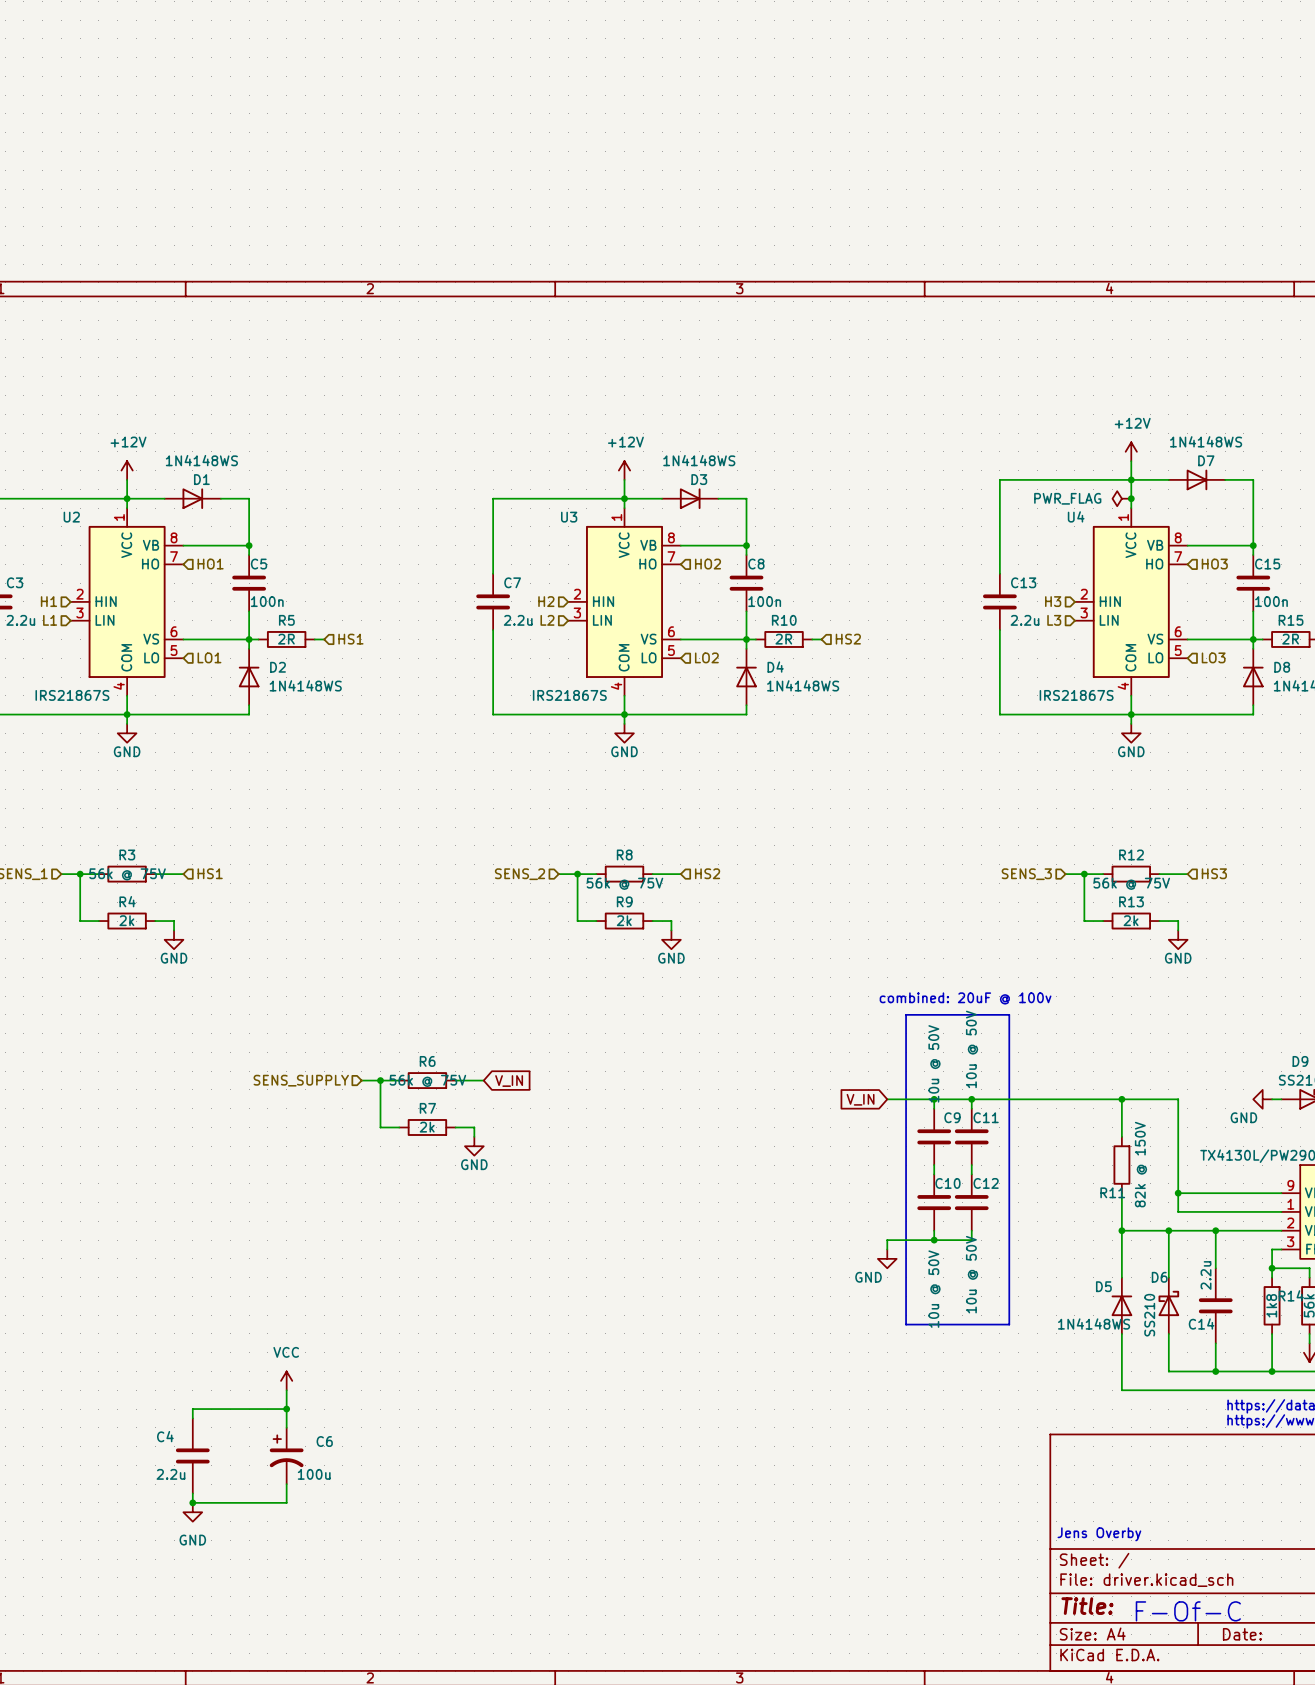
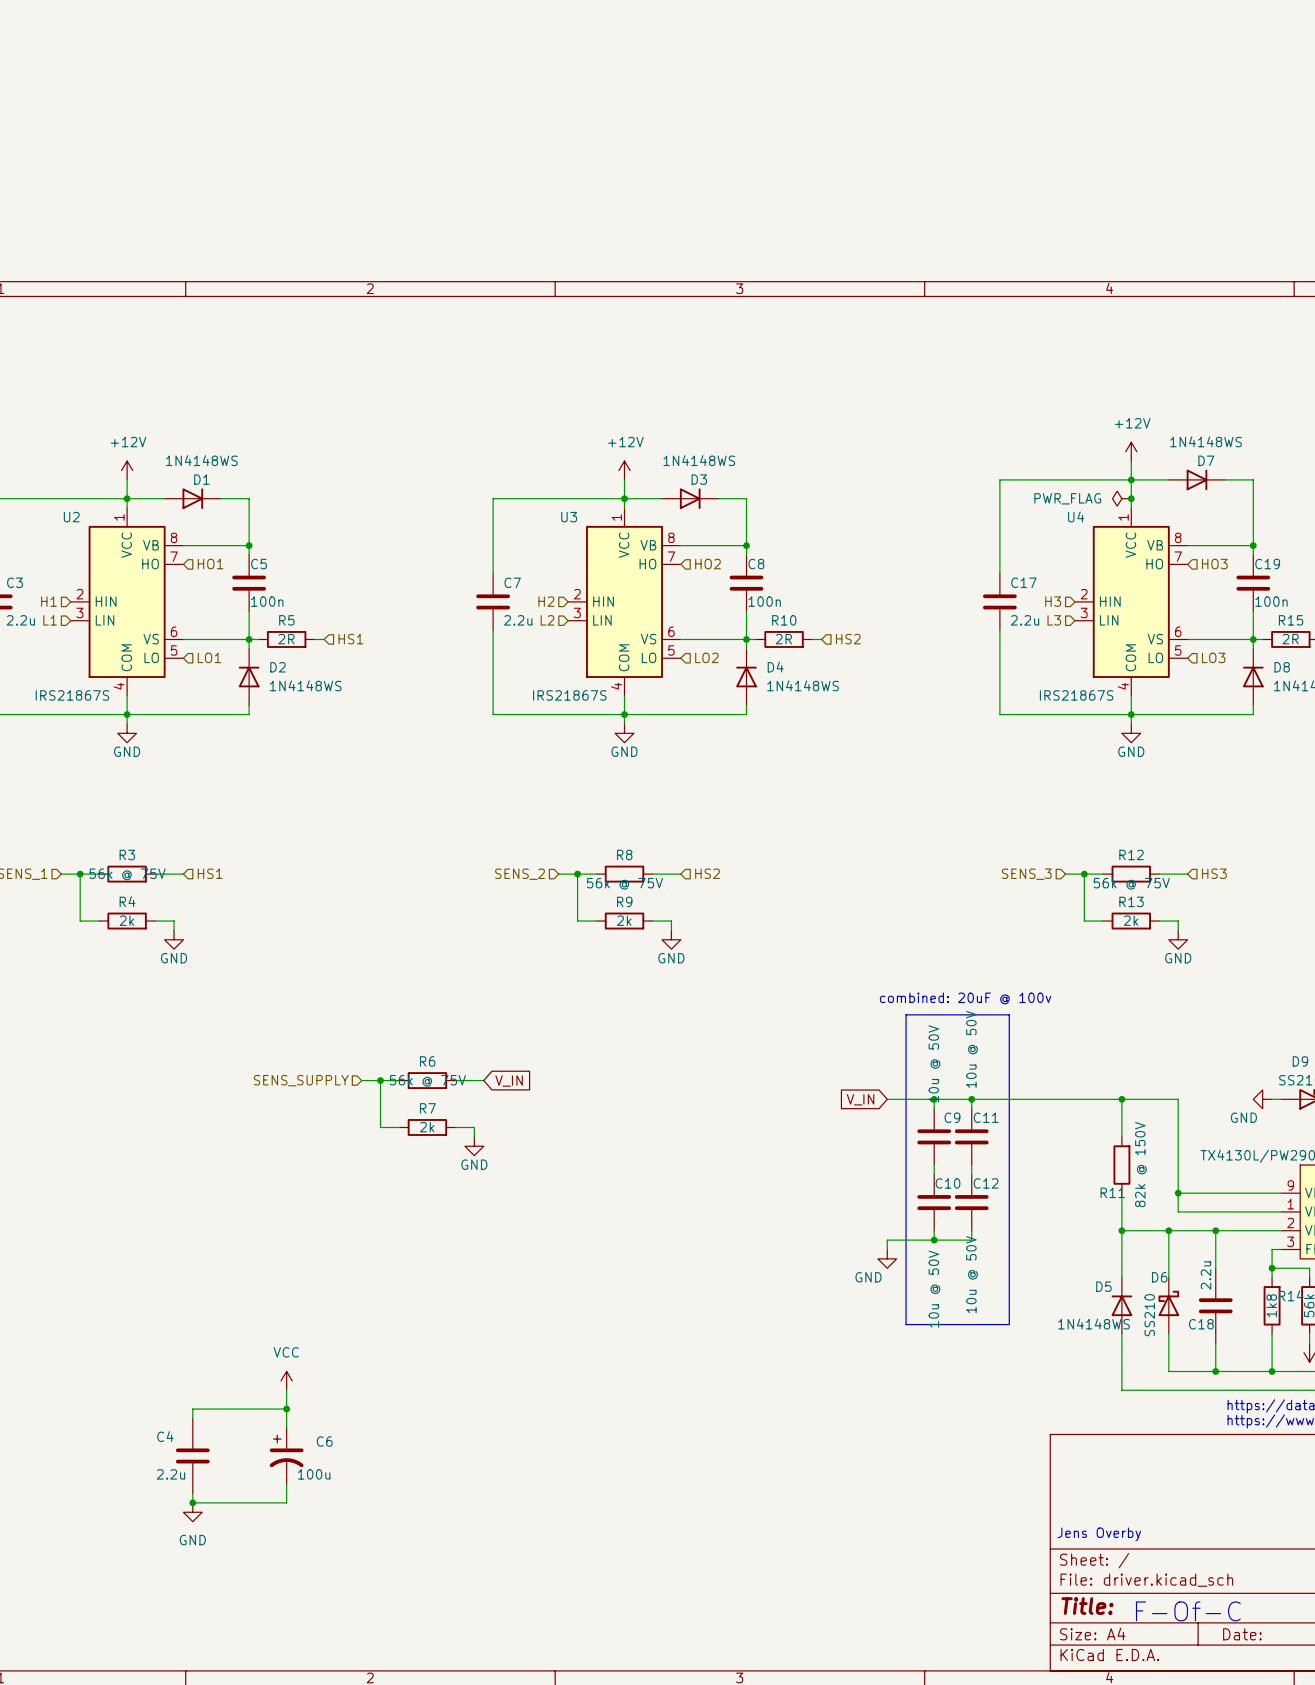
C15 name: C15 (1267, 564) -> C19 (1267, 564)
C13 name: C13 (1023, 582) -> C17 (1023, 582)
C14 name: C14 (1201, 1324) -> C18 (1201, 1324)

